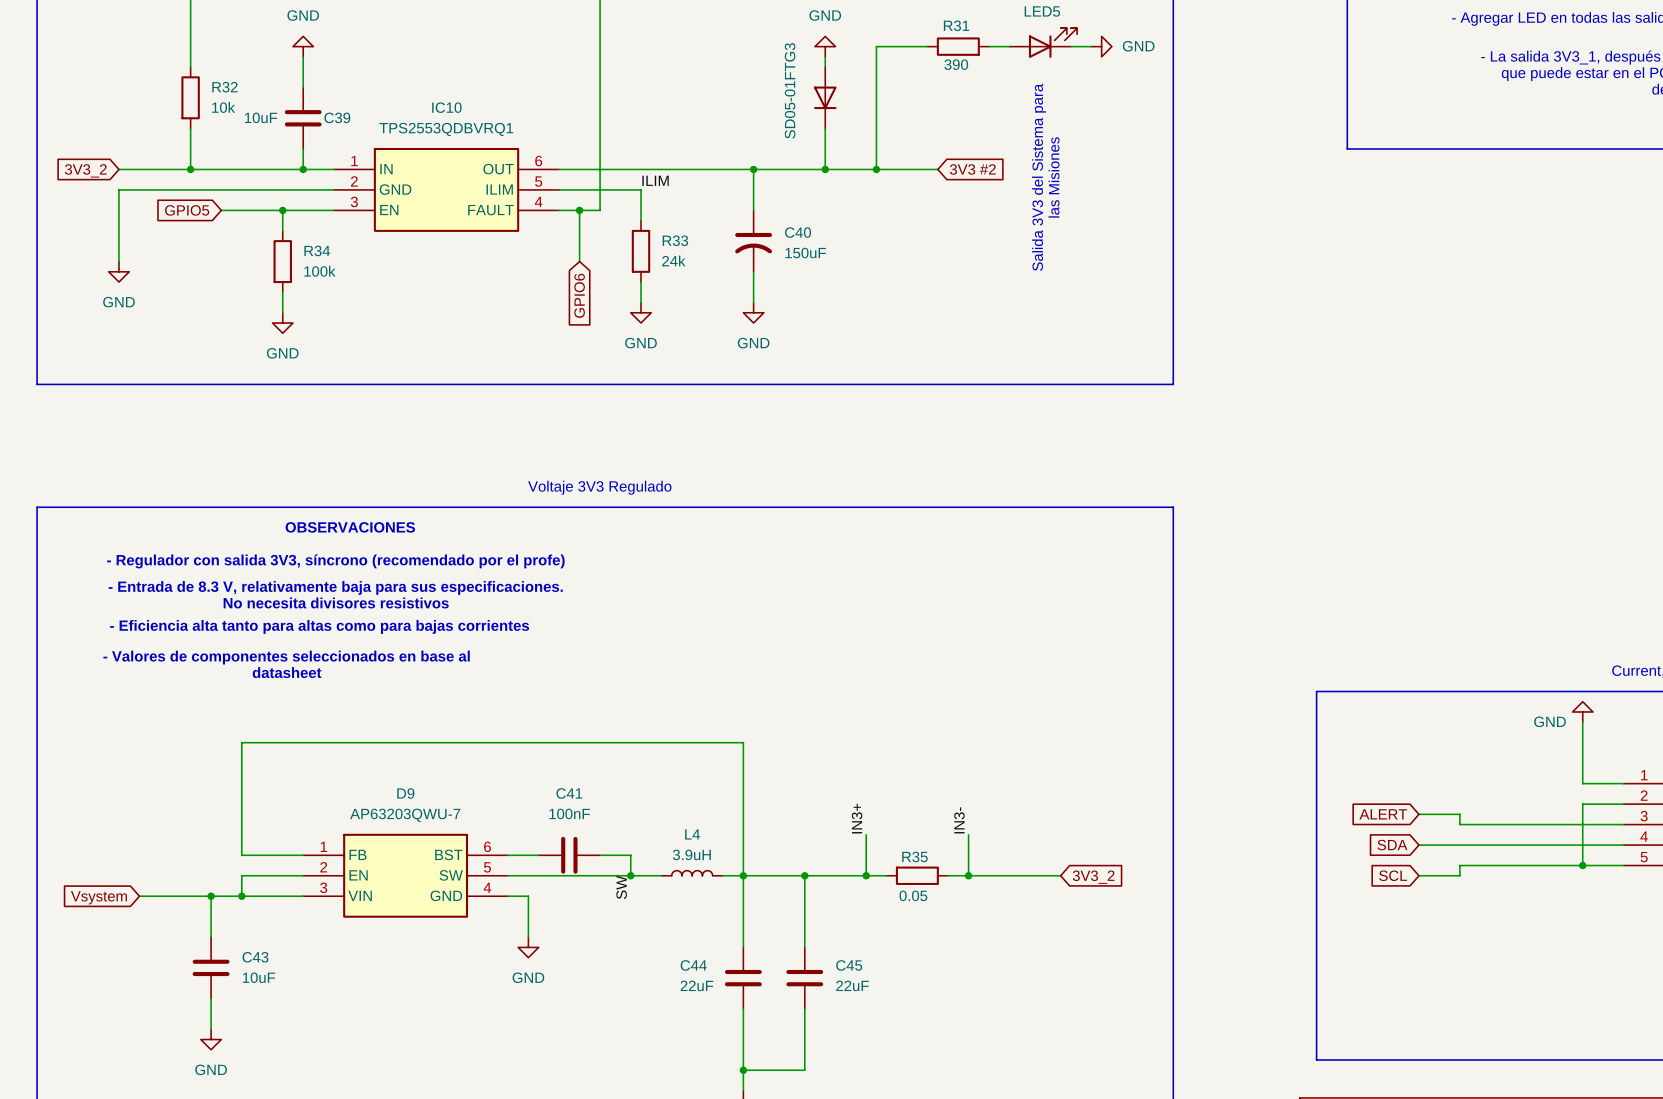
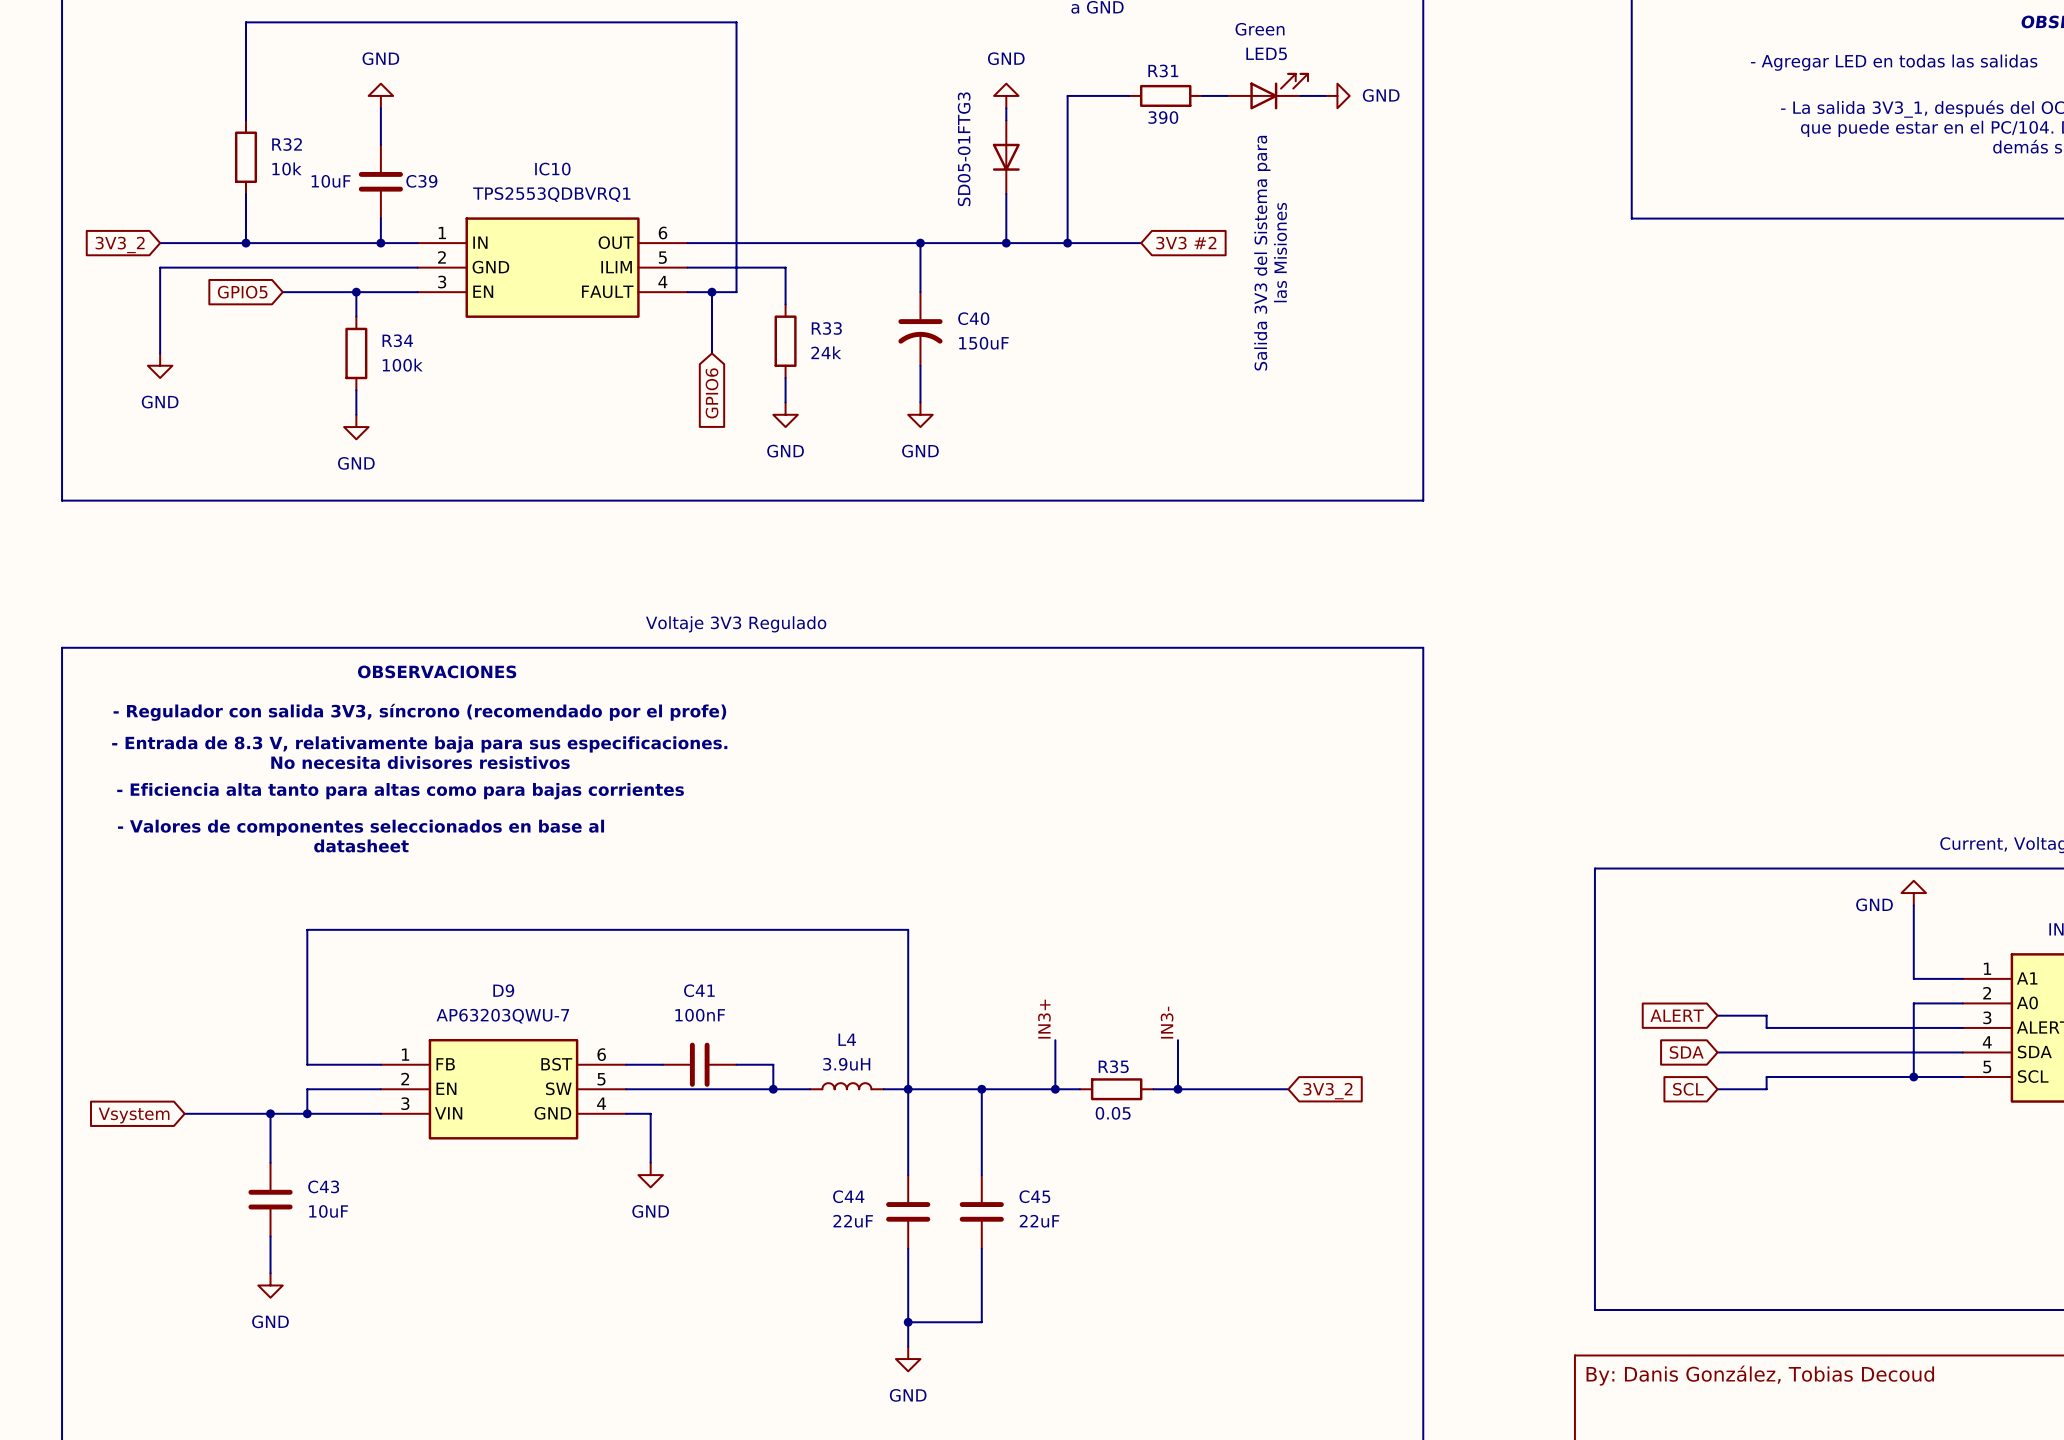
label: ILIM (655, 180) -> none
label: SW (621, 887) -> none

